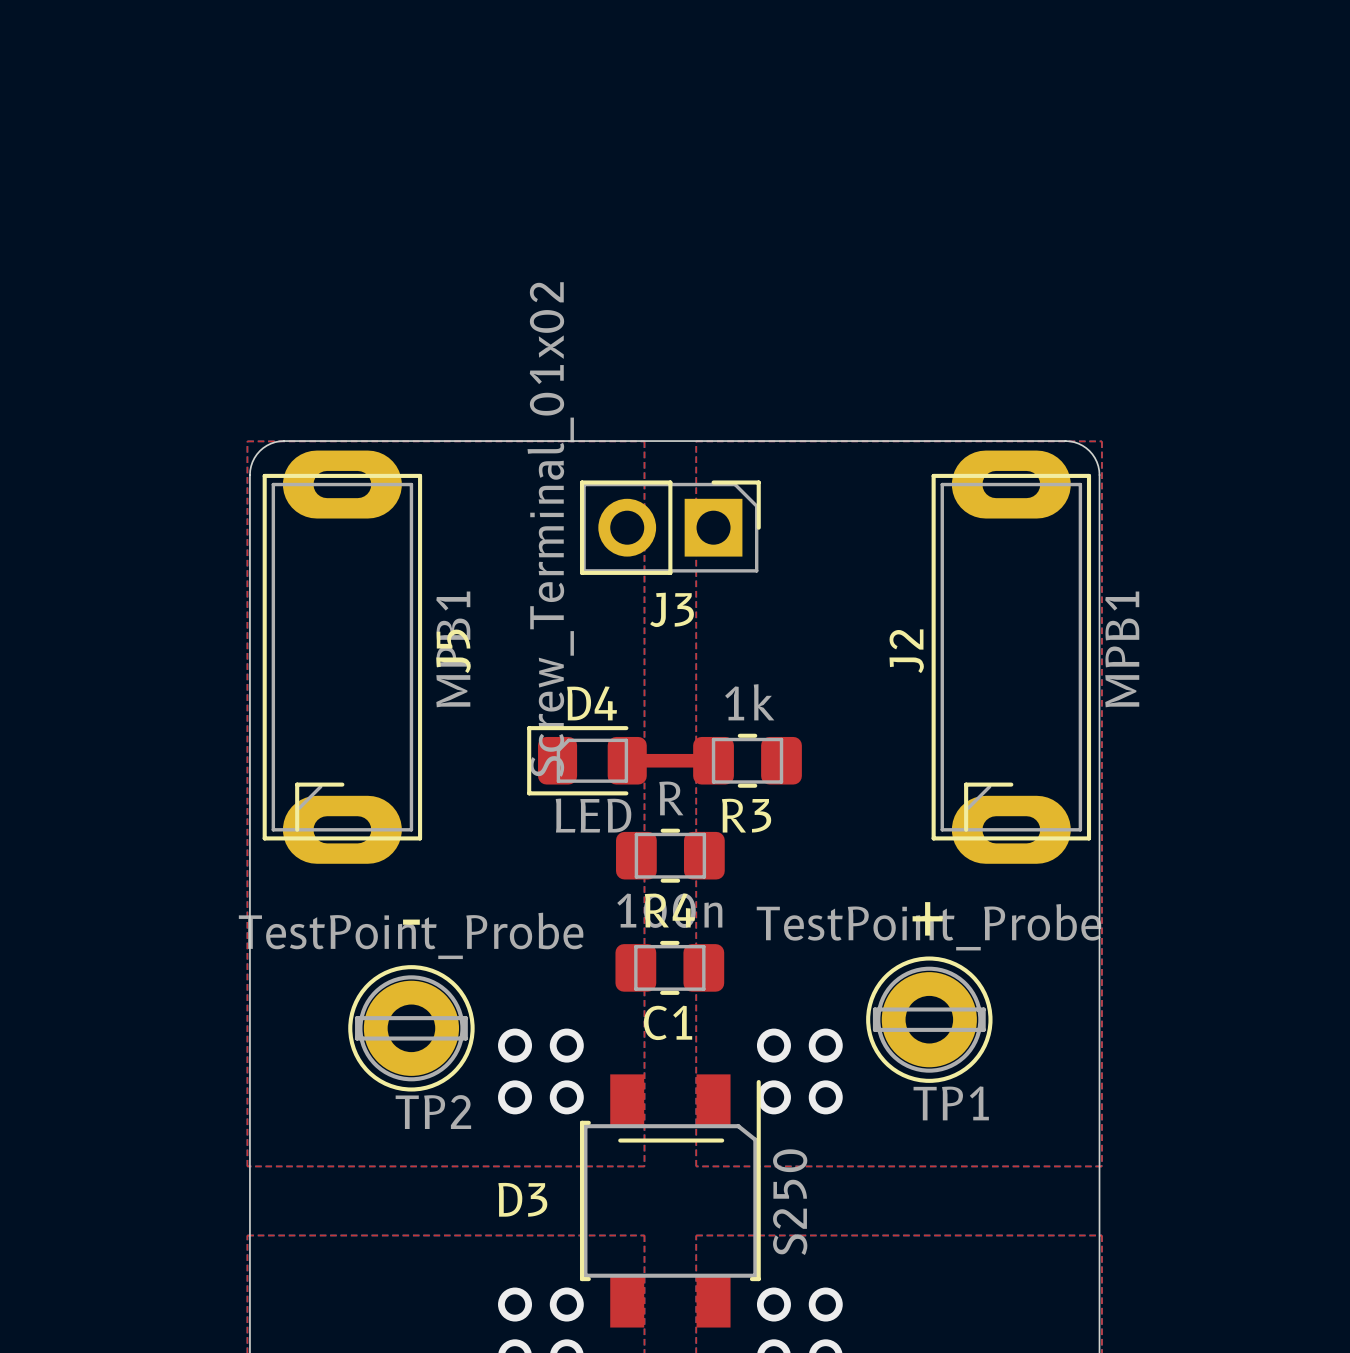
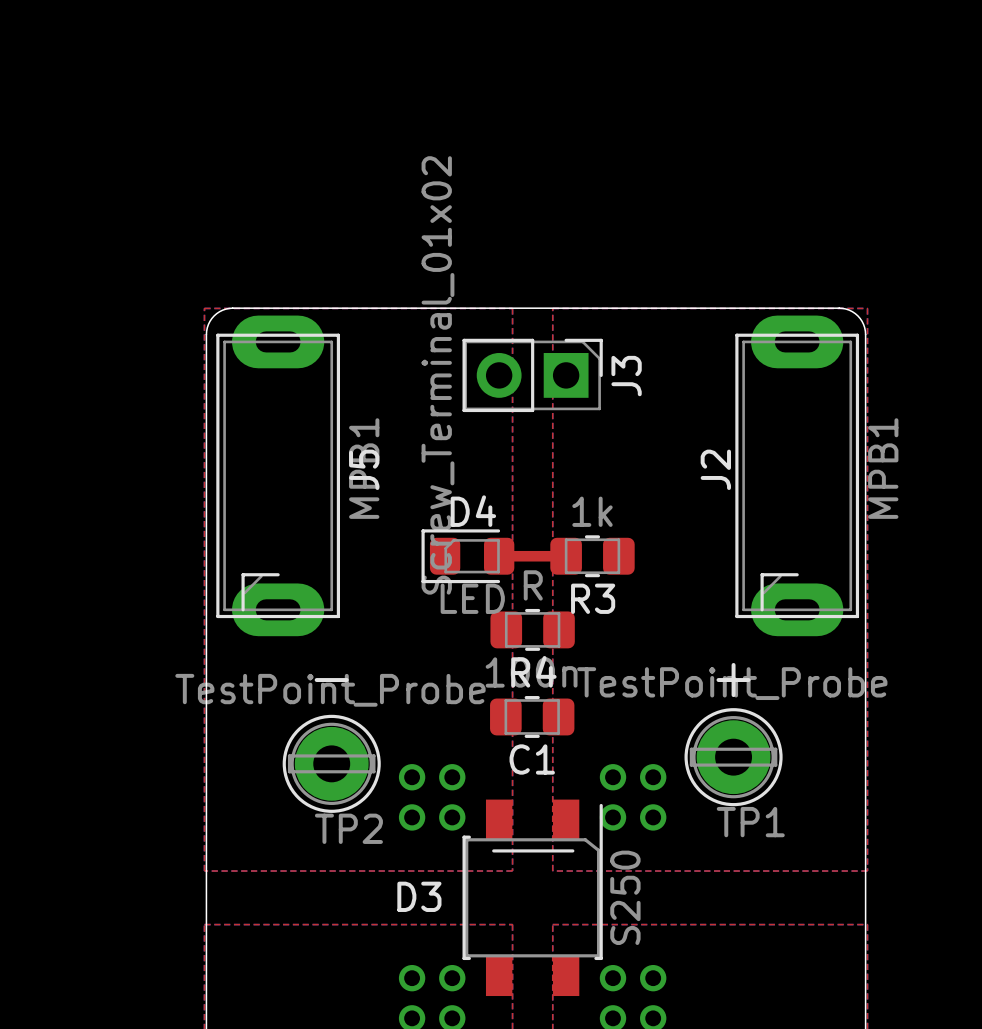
J3 name rotation: 0° (672, 609) -> 90° counterclockwise (626, 376)
J3 name position: J3 (672, 609) -> J3 (626, 376)

